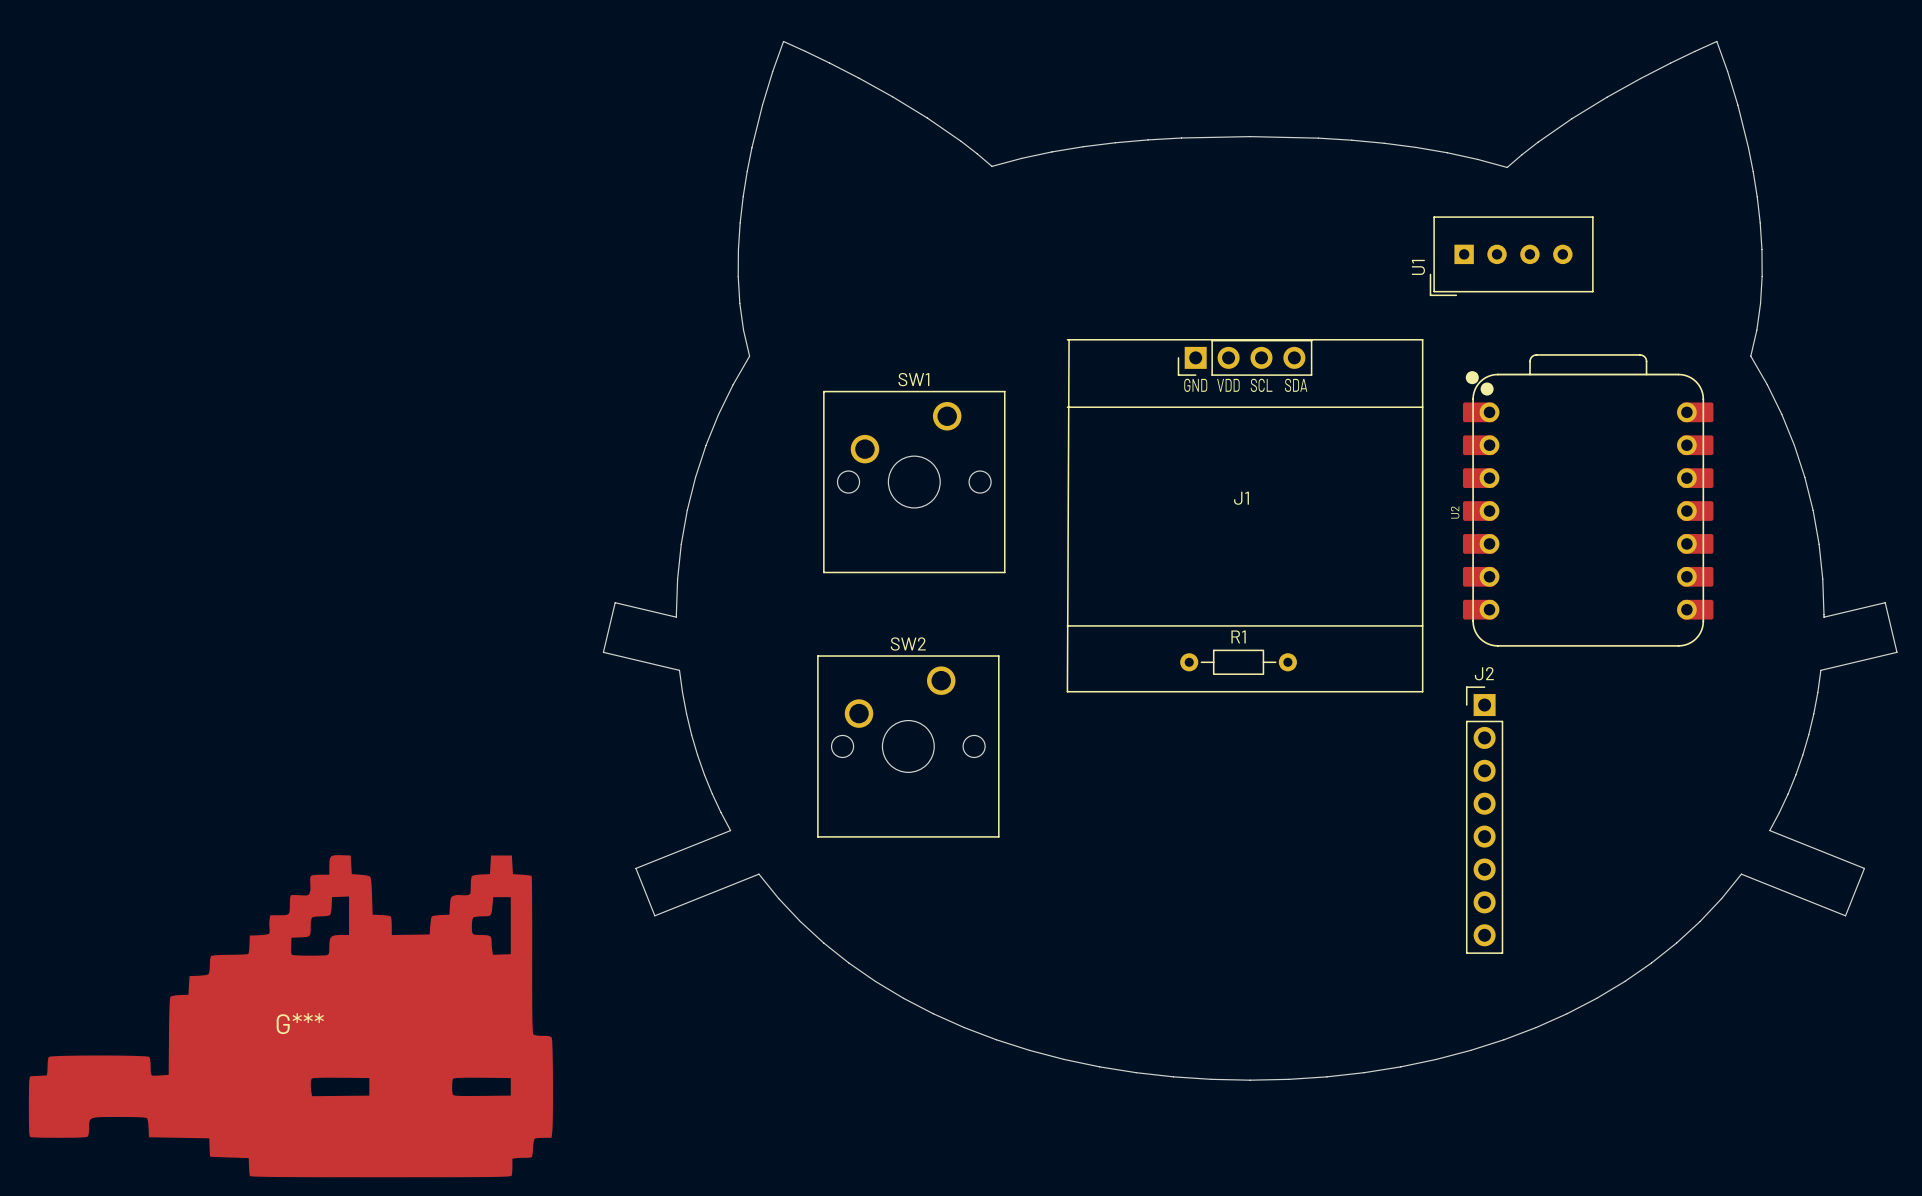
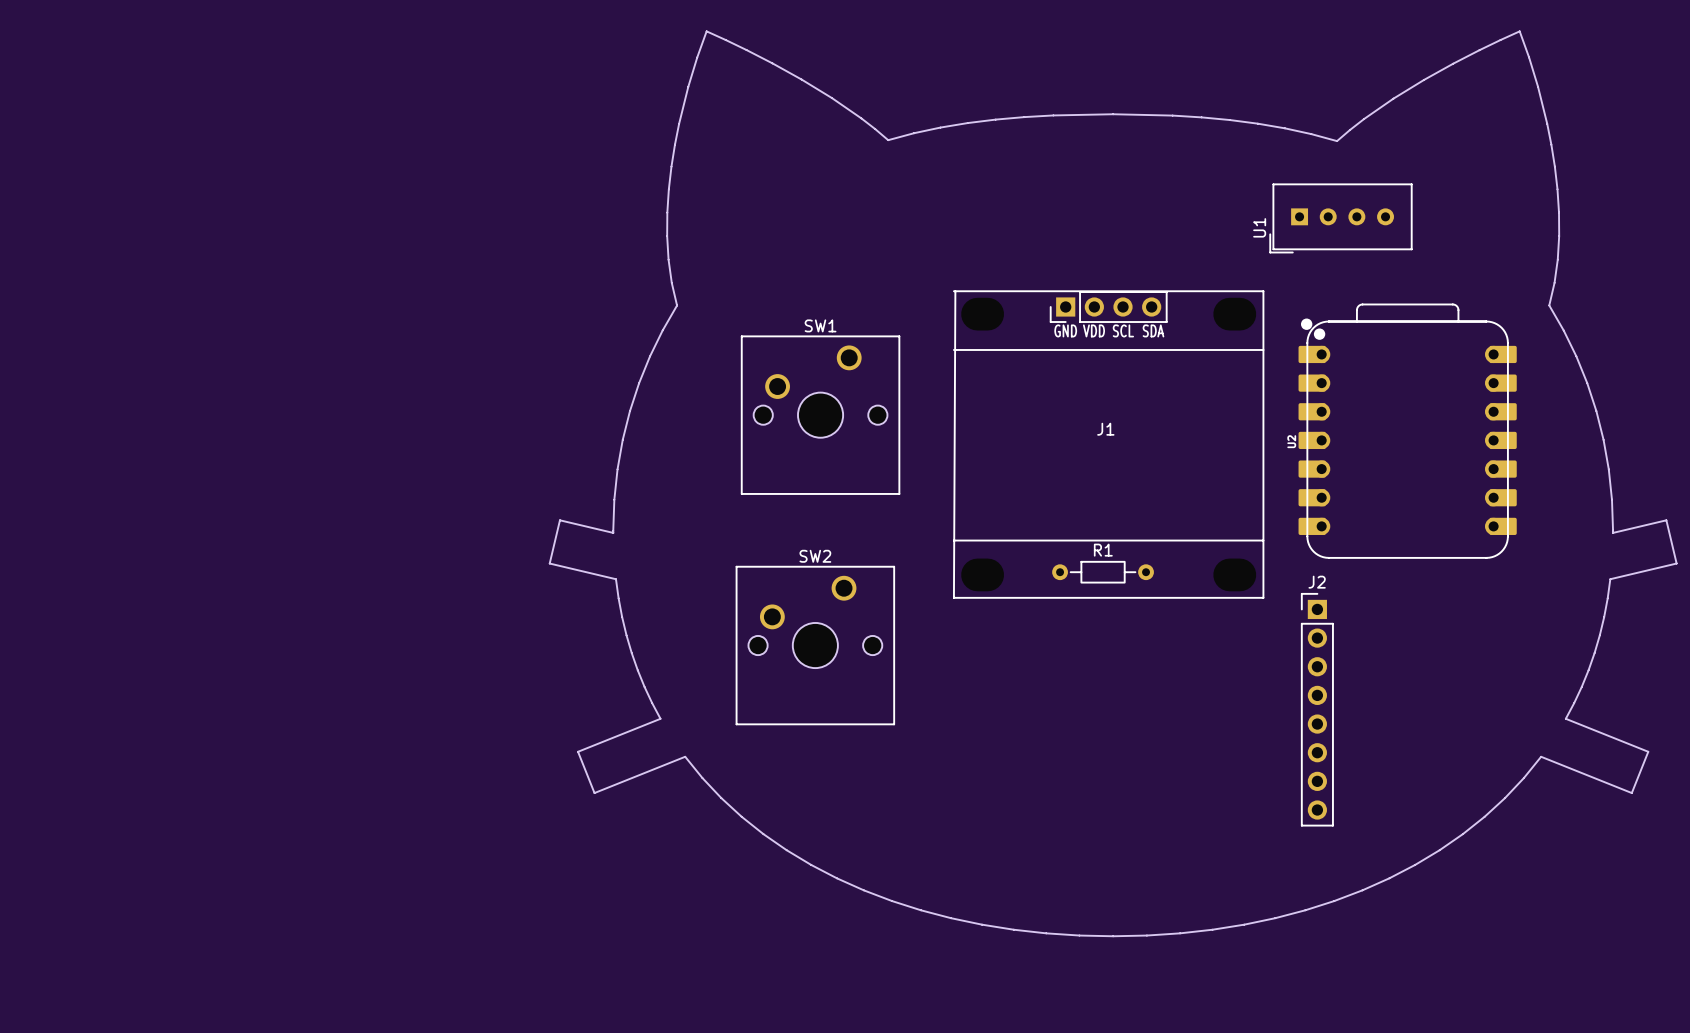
G***: (290, 1016) -> none

